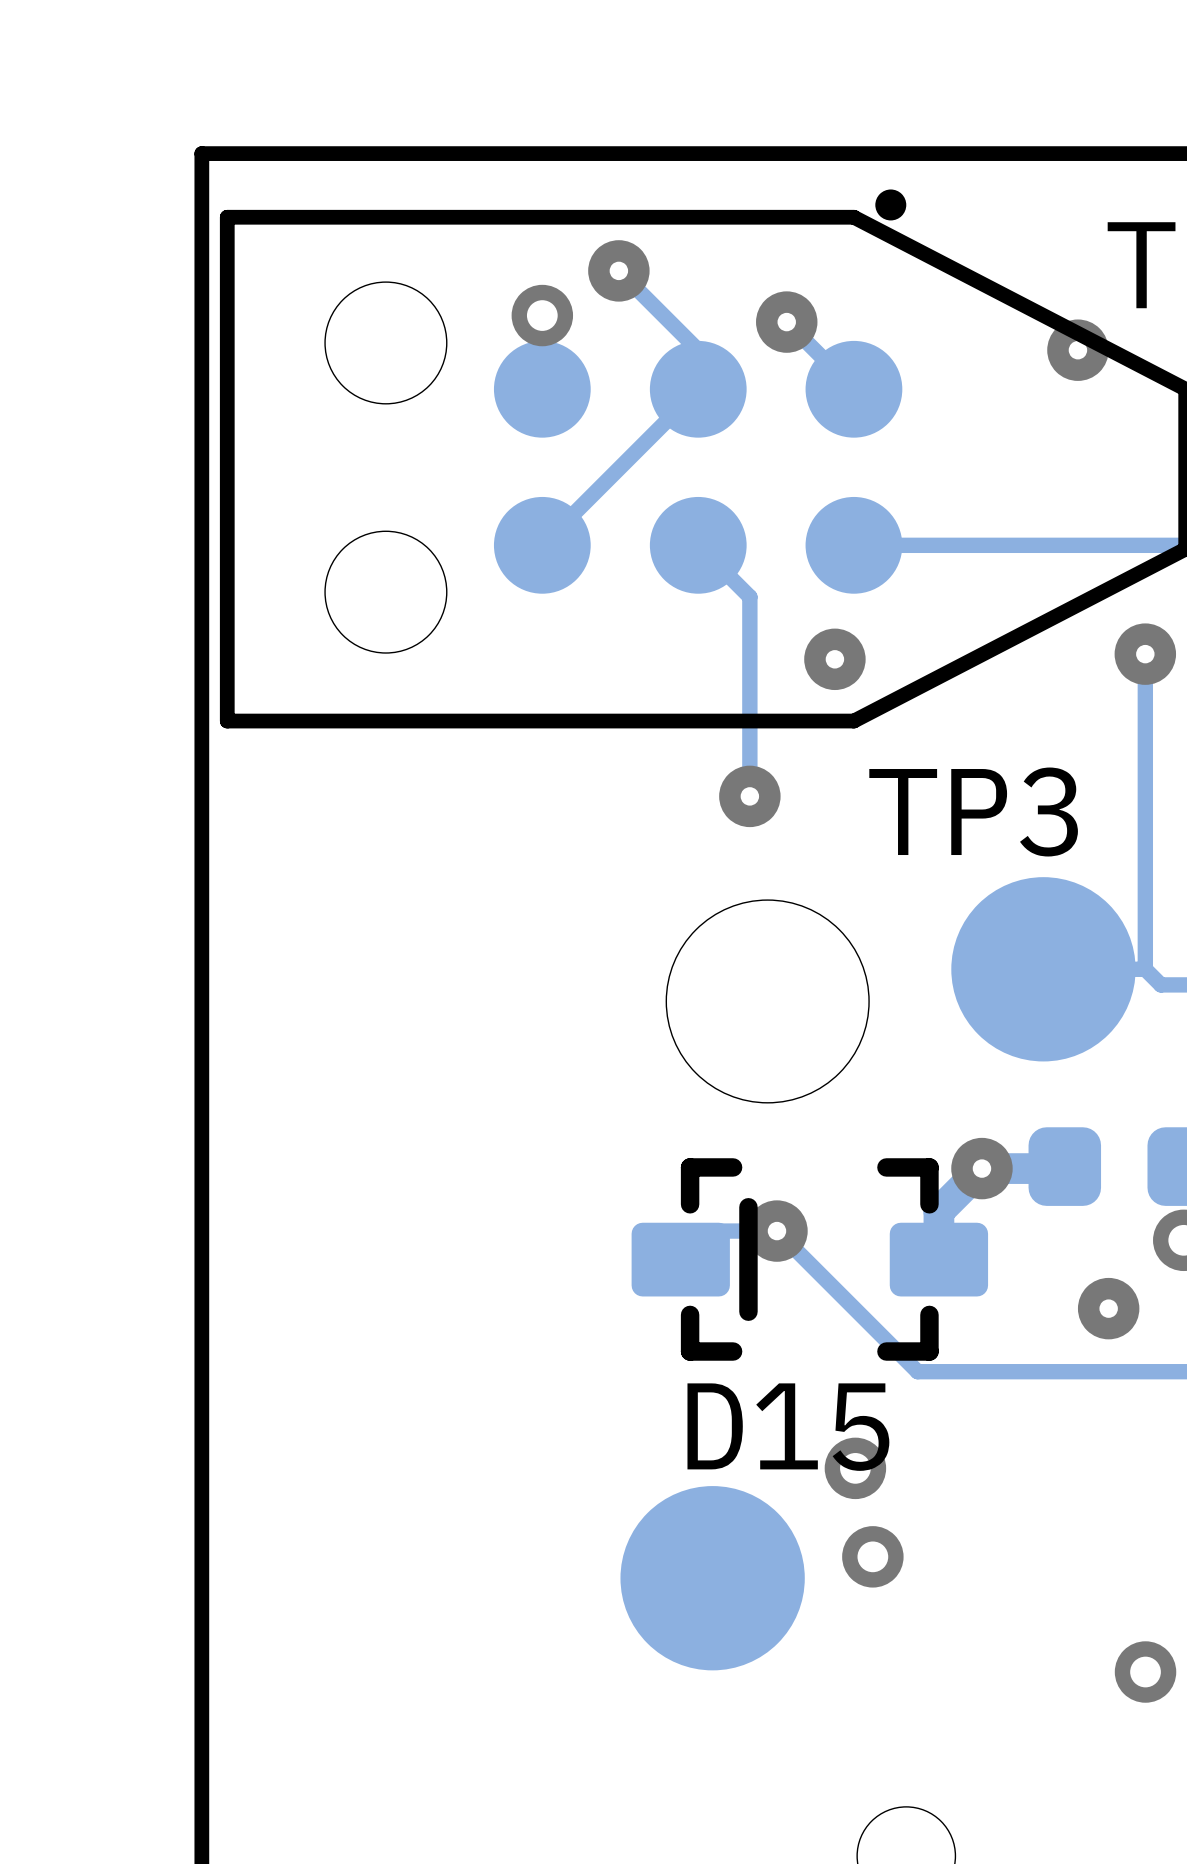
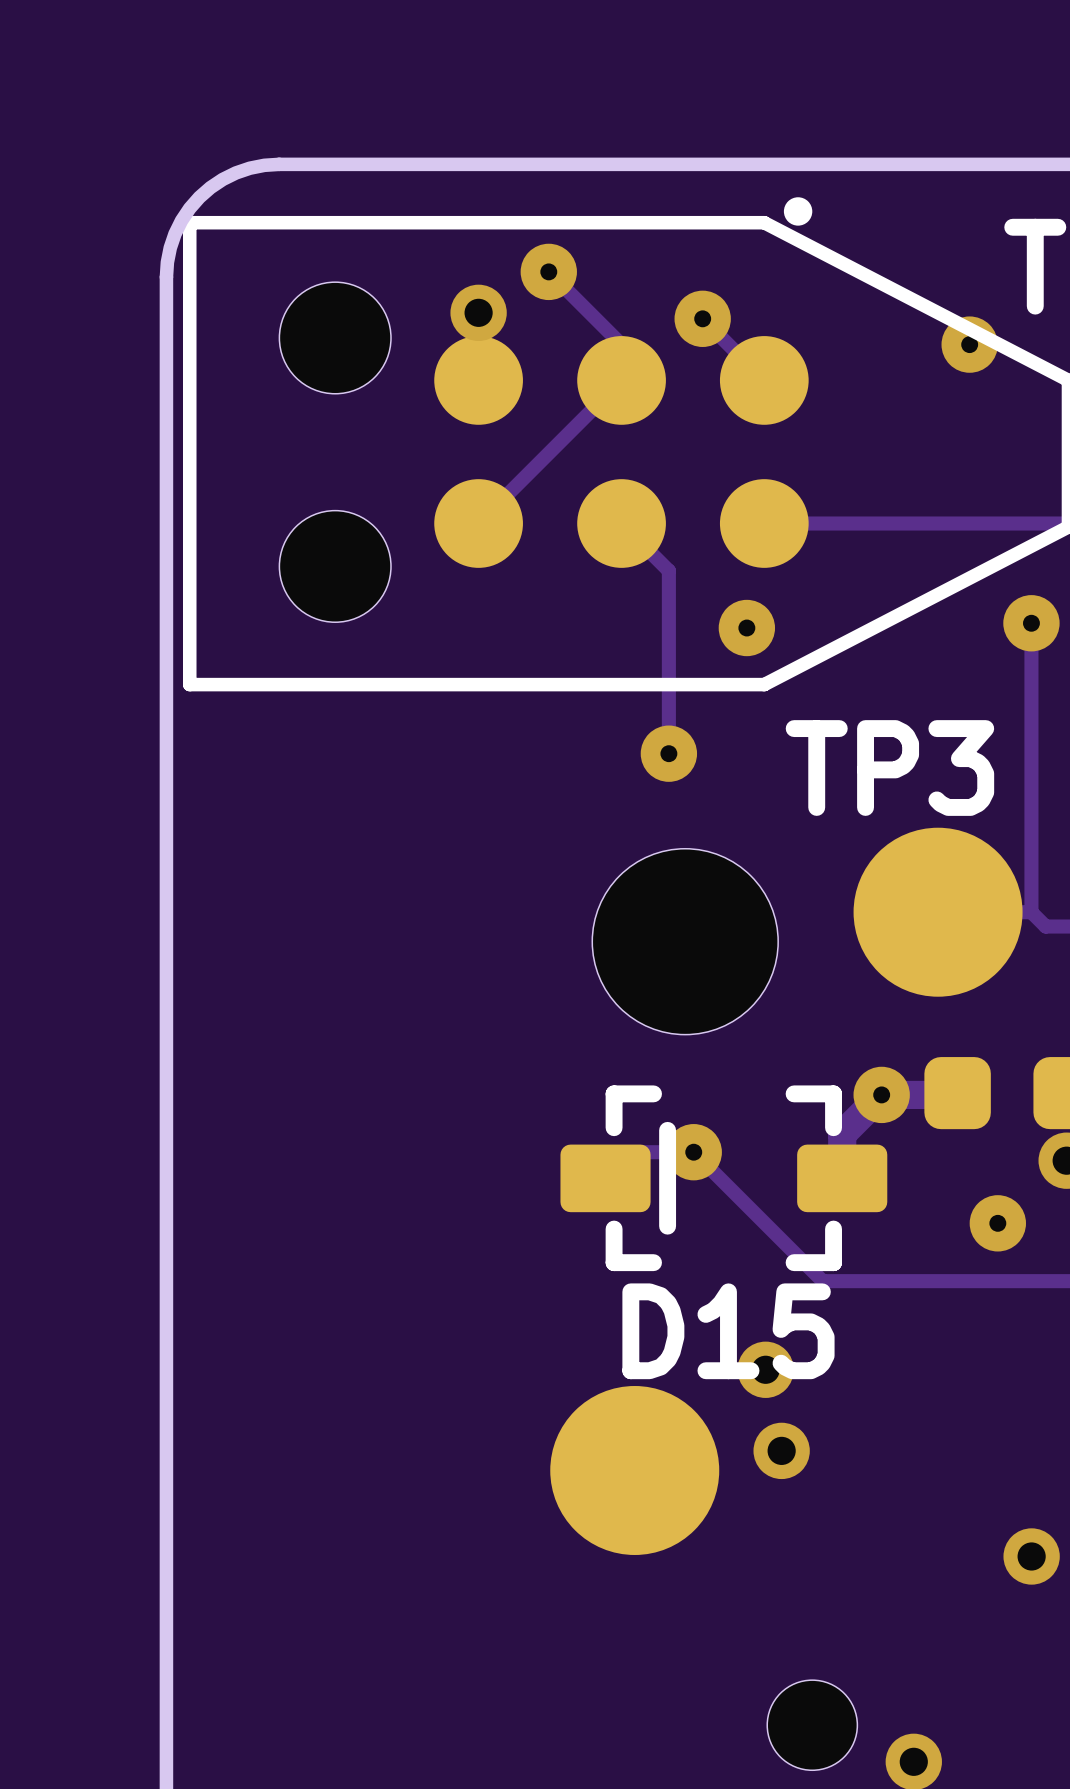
board edge: (324, 153) (201, 153) (201, 276) -> (279, 164) (264, 165) (235, 172) (210, 187) (199, 197) (189, 208) (175, 233) (167, 262) (166, 277)

